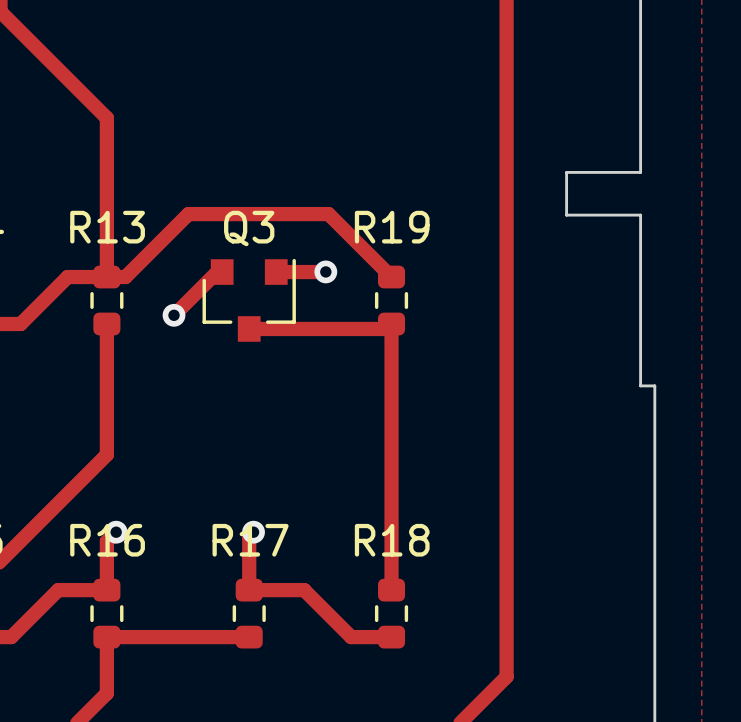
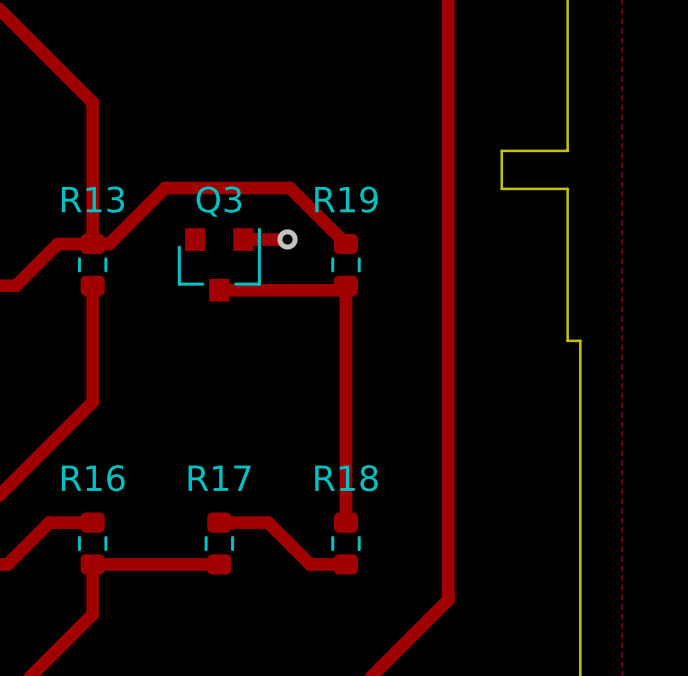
track: (222, 272) (217, 272) (174, 315) -> none
via: (174, 315) -> none
track: (116, 532) (106, 541) (106, 590) -> none
via: (116, 532) -> none
track: (253, 532) (249, 536) (249, 590) -> none
via: (253, 532) -> none

